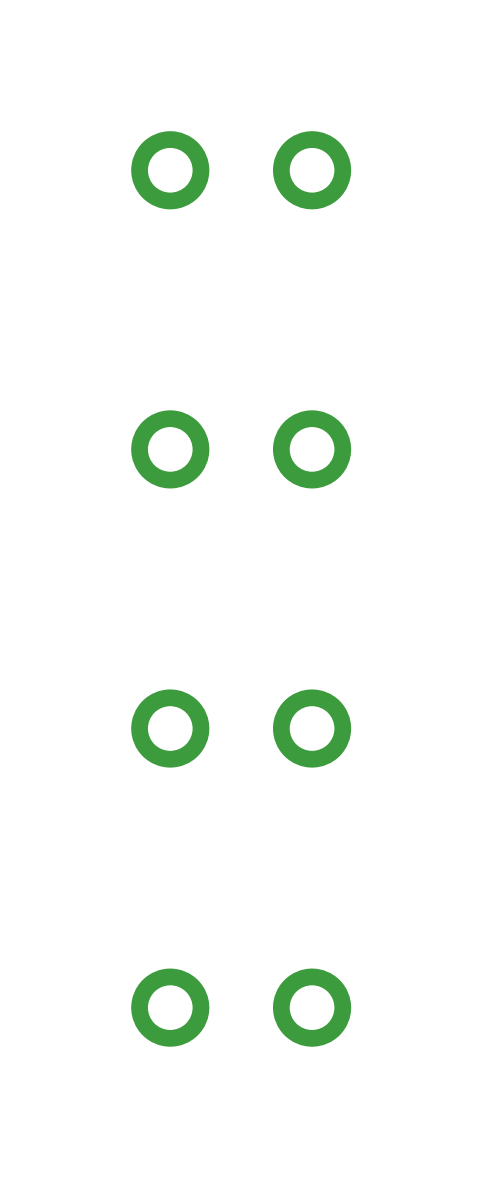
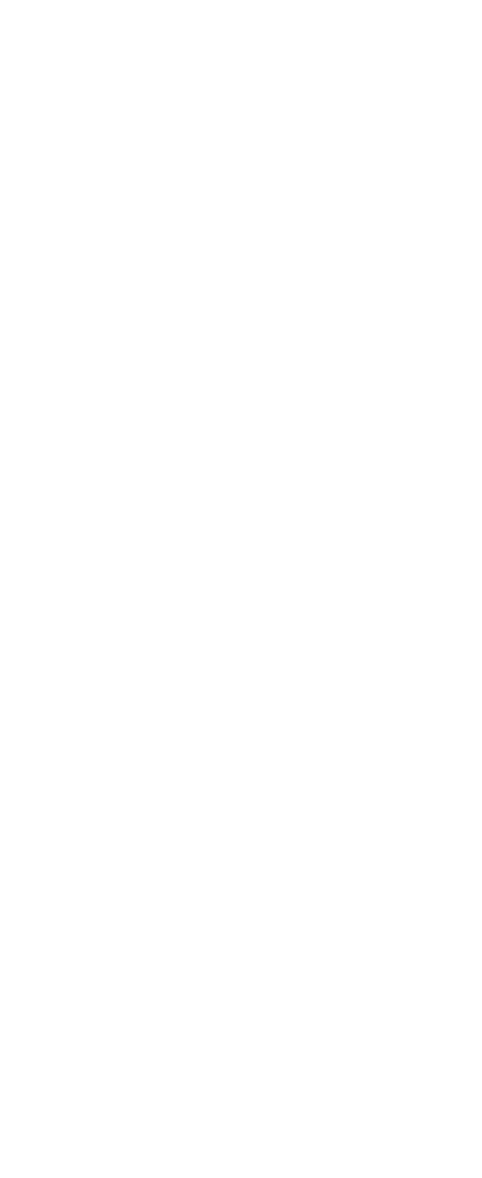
part: (241, 170) -> none
part: (241, 449) -> none
part: (241, 728) -> none
part: (241, 1007) -> none

